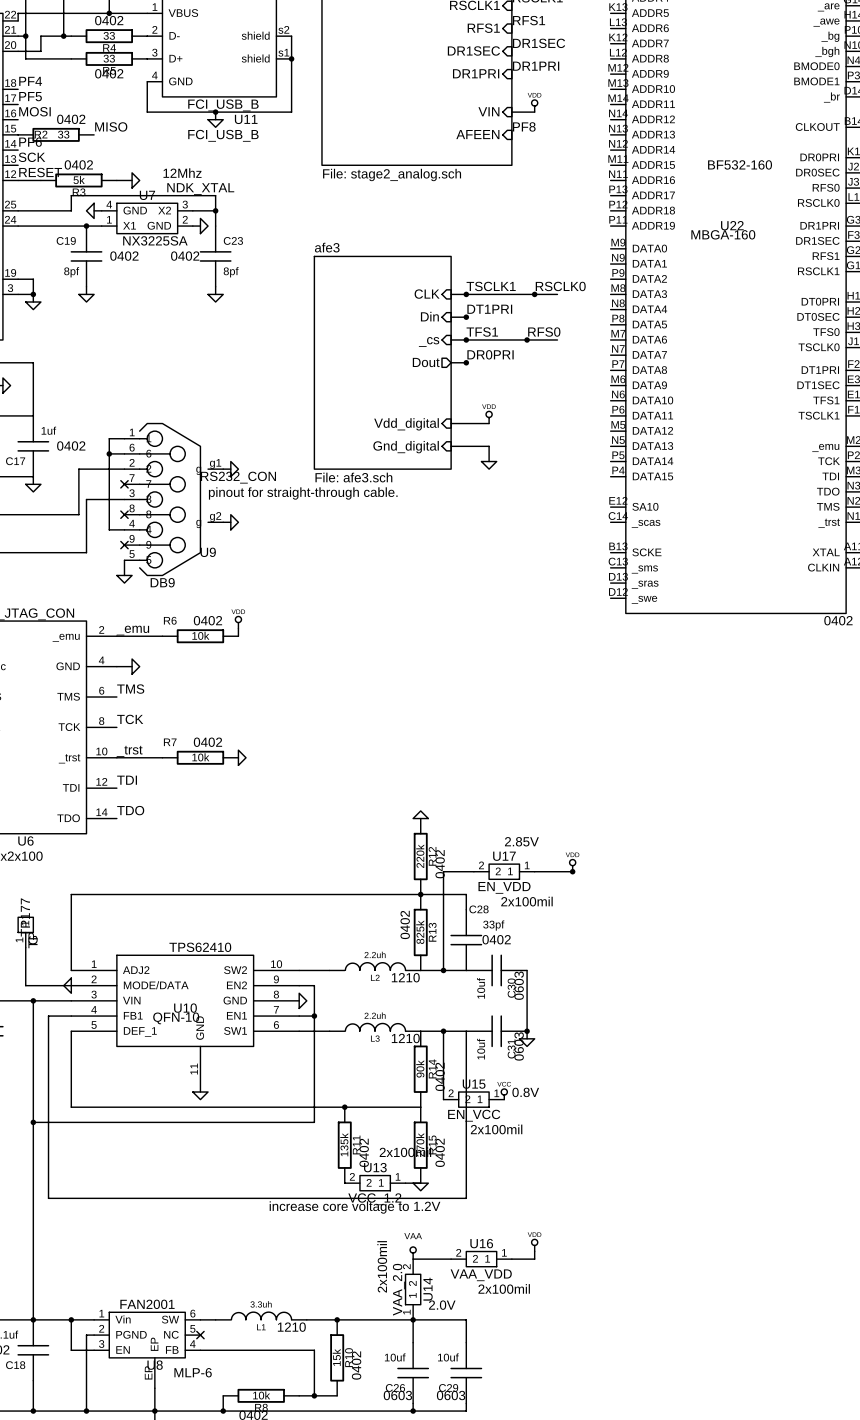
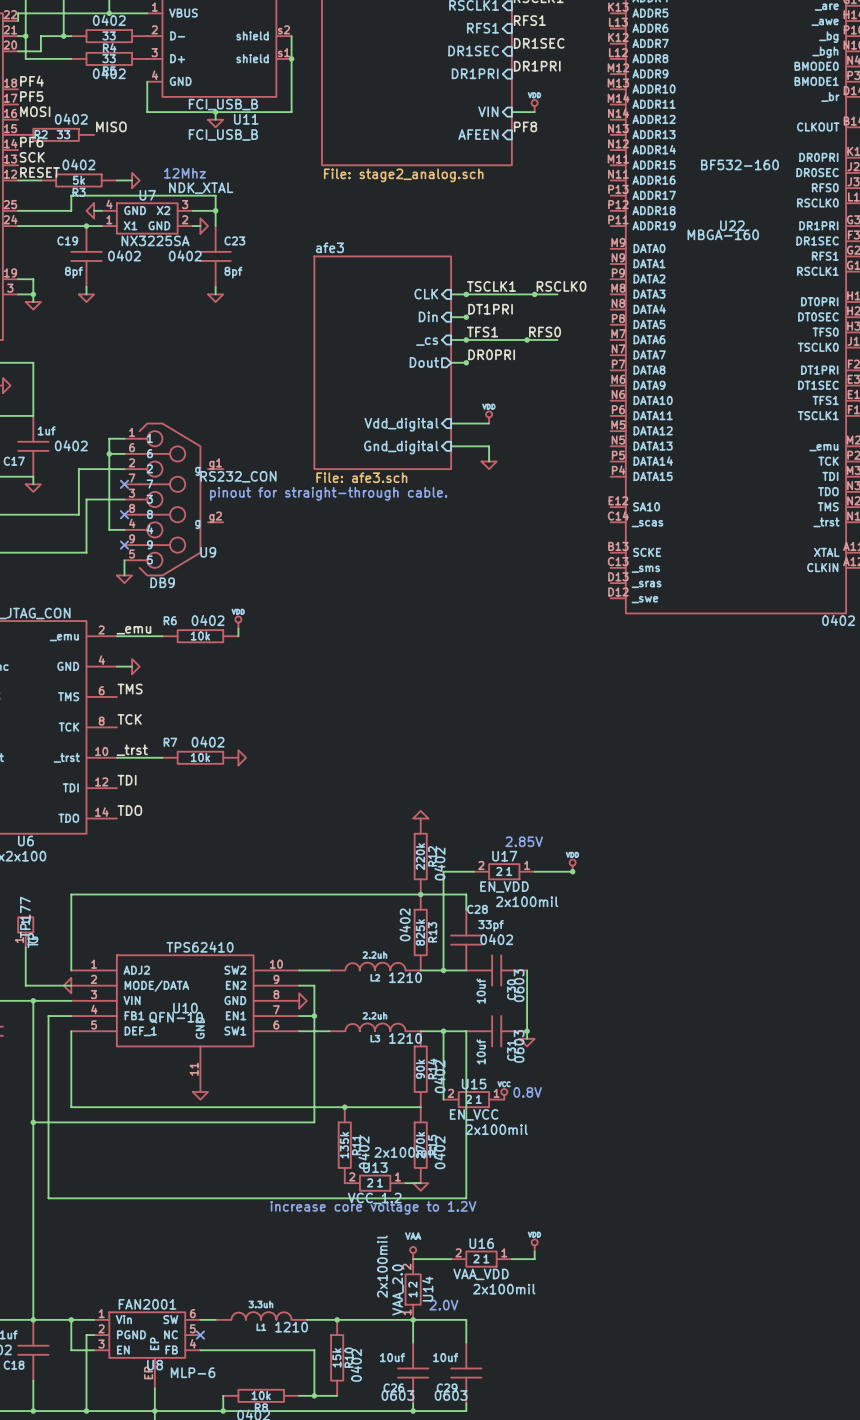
wire: (223, 469) (230, 469) -> none
power symbol: (234, 469) -> none
wire: (223, 522) (230, 522) -> none
power symbol: (234, 522) -> none

